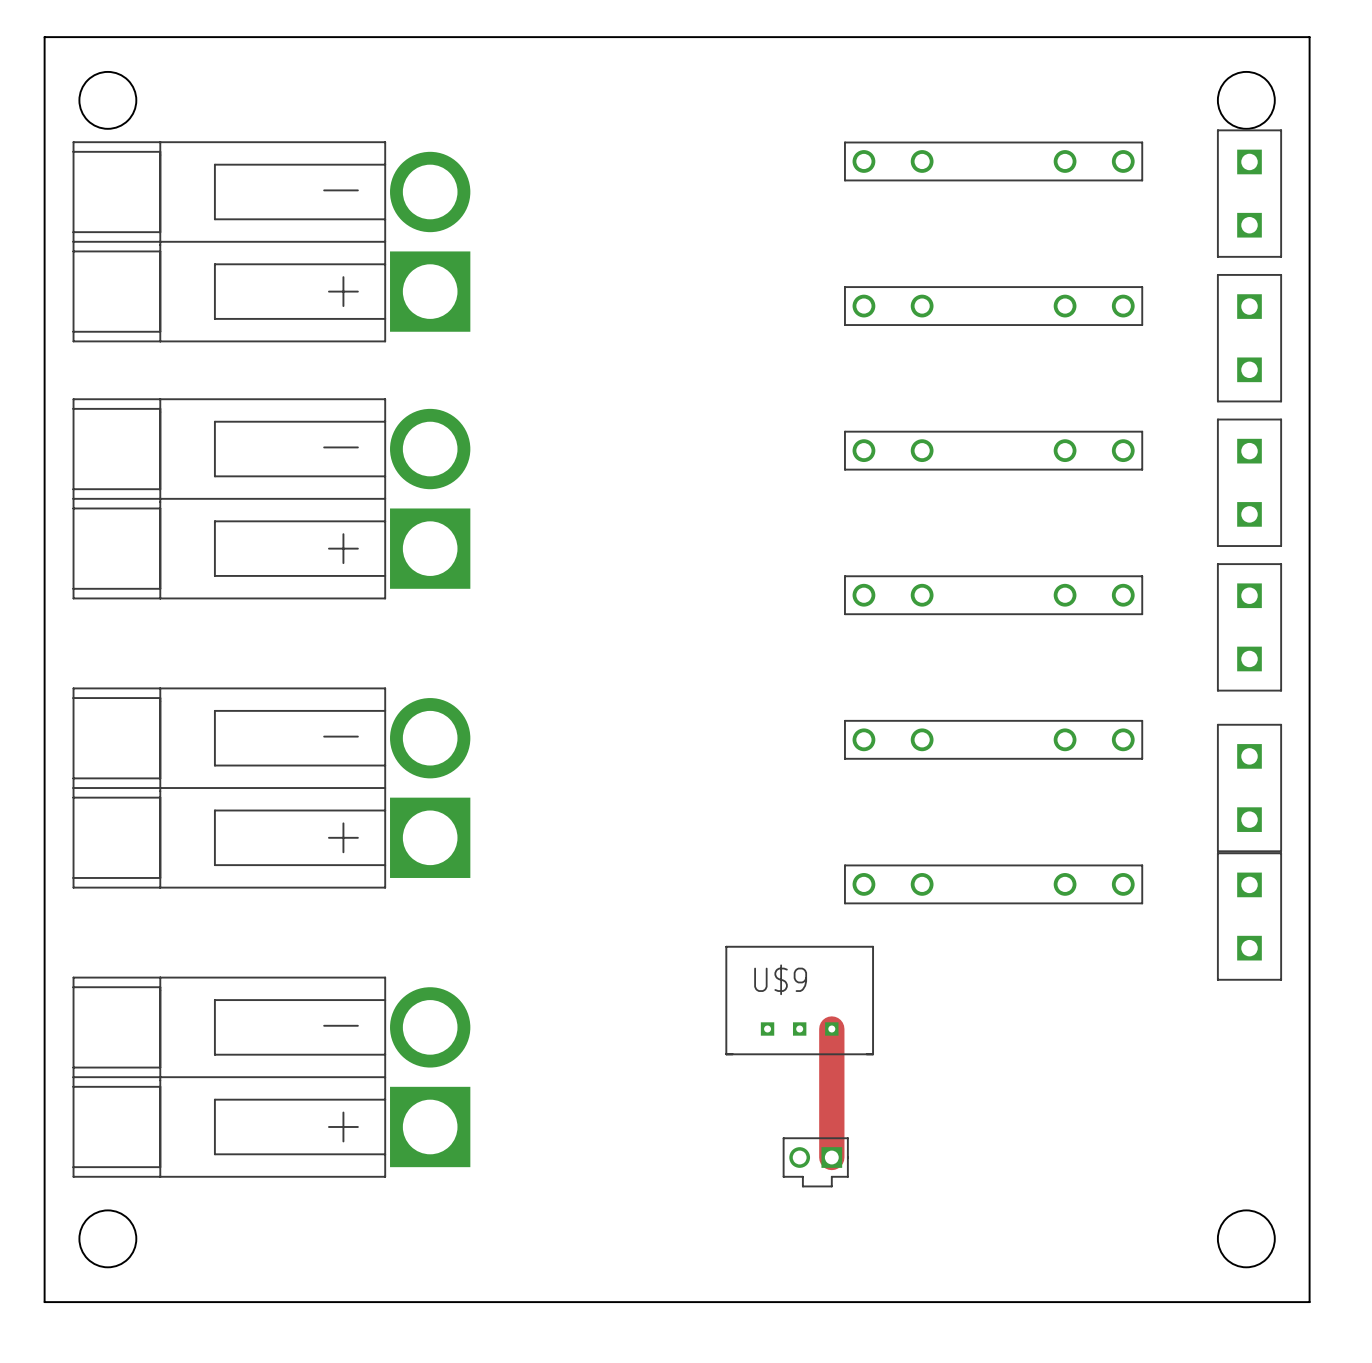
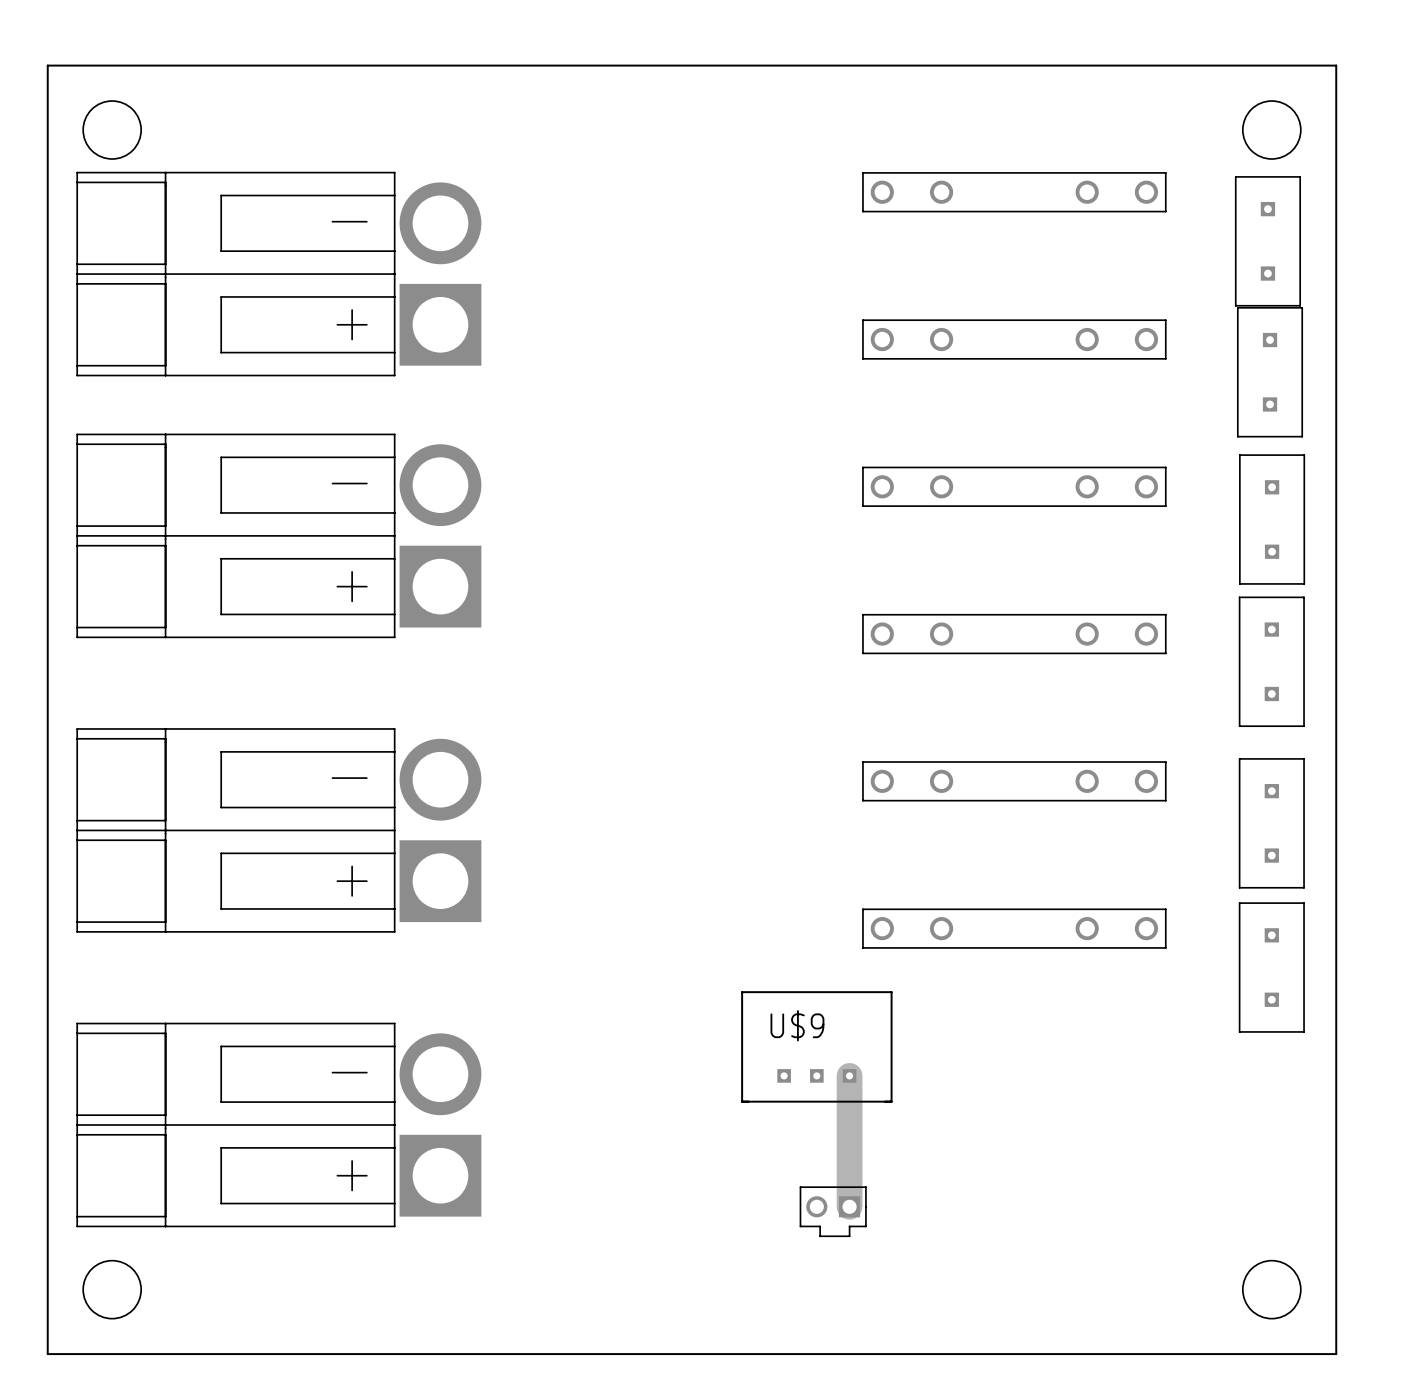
part: (1249, 193) -> none
part: none -> (1267, 241)
part footprint: [1217, 274, 1282, 403] -> [1236, 307, 1304, 438]
part footprint: [1217, 418, 1282, 547] -> [1239, 454, 1306, 585]
part footprint: [1217, 563, 1282, 692] -> [1238, 596, 1305, 728]
part footprint: [1217, 723, 1282, 853] -> [1238, 758, 1305, 889]
part footprint: [1217, 852, 1282, 981] -> [1238, 902, 1305, 1033]

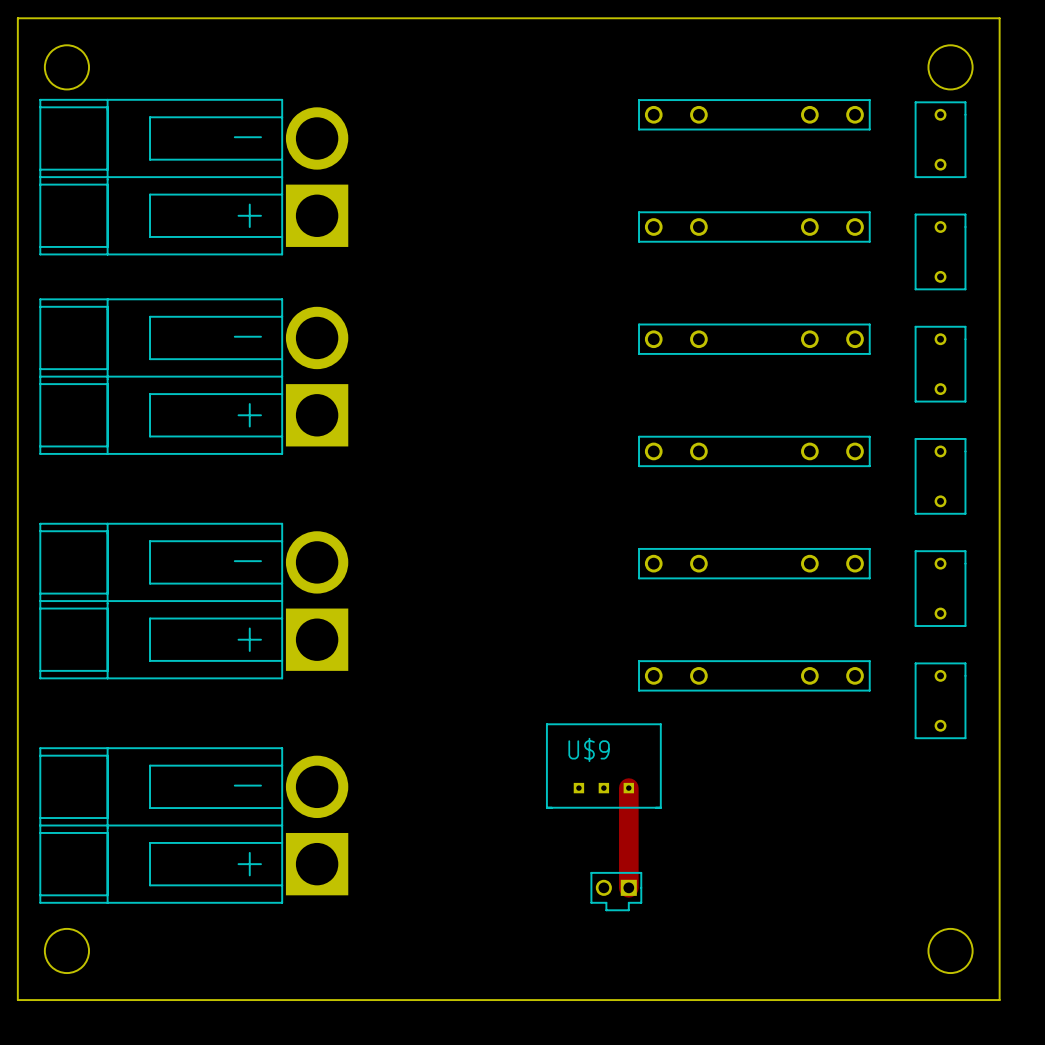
part: none -> (940, 139)
part: (1267, 241) -> none
part footprint: [1236, 307, 1304, 438] -> [914, 213, 967, 290]
part: none -> (940, 364)
part: (1272, 519) -> none
part: (1271, 661) -> none
part: none -> (940, 476)
part: none -> (940, 588)
part: (1271, 823) -> none
part: none -> (940, 700)
part: (1271, 967) -> none

